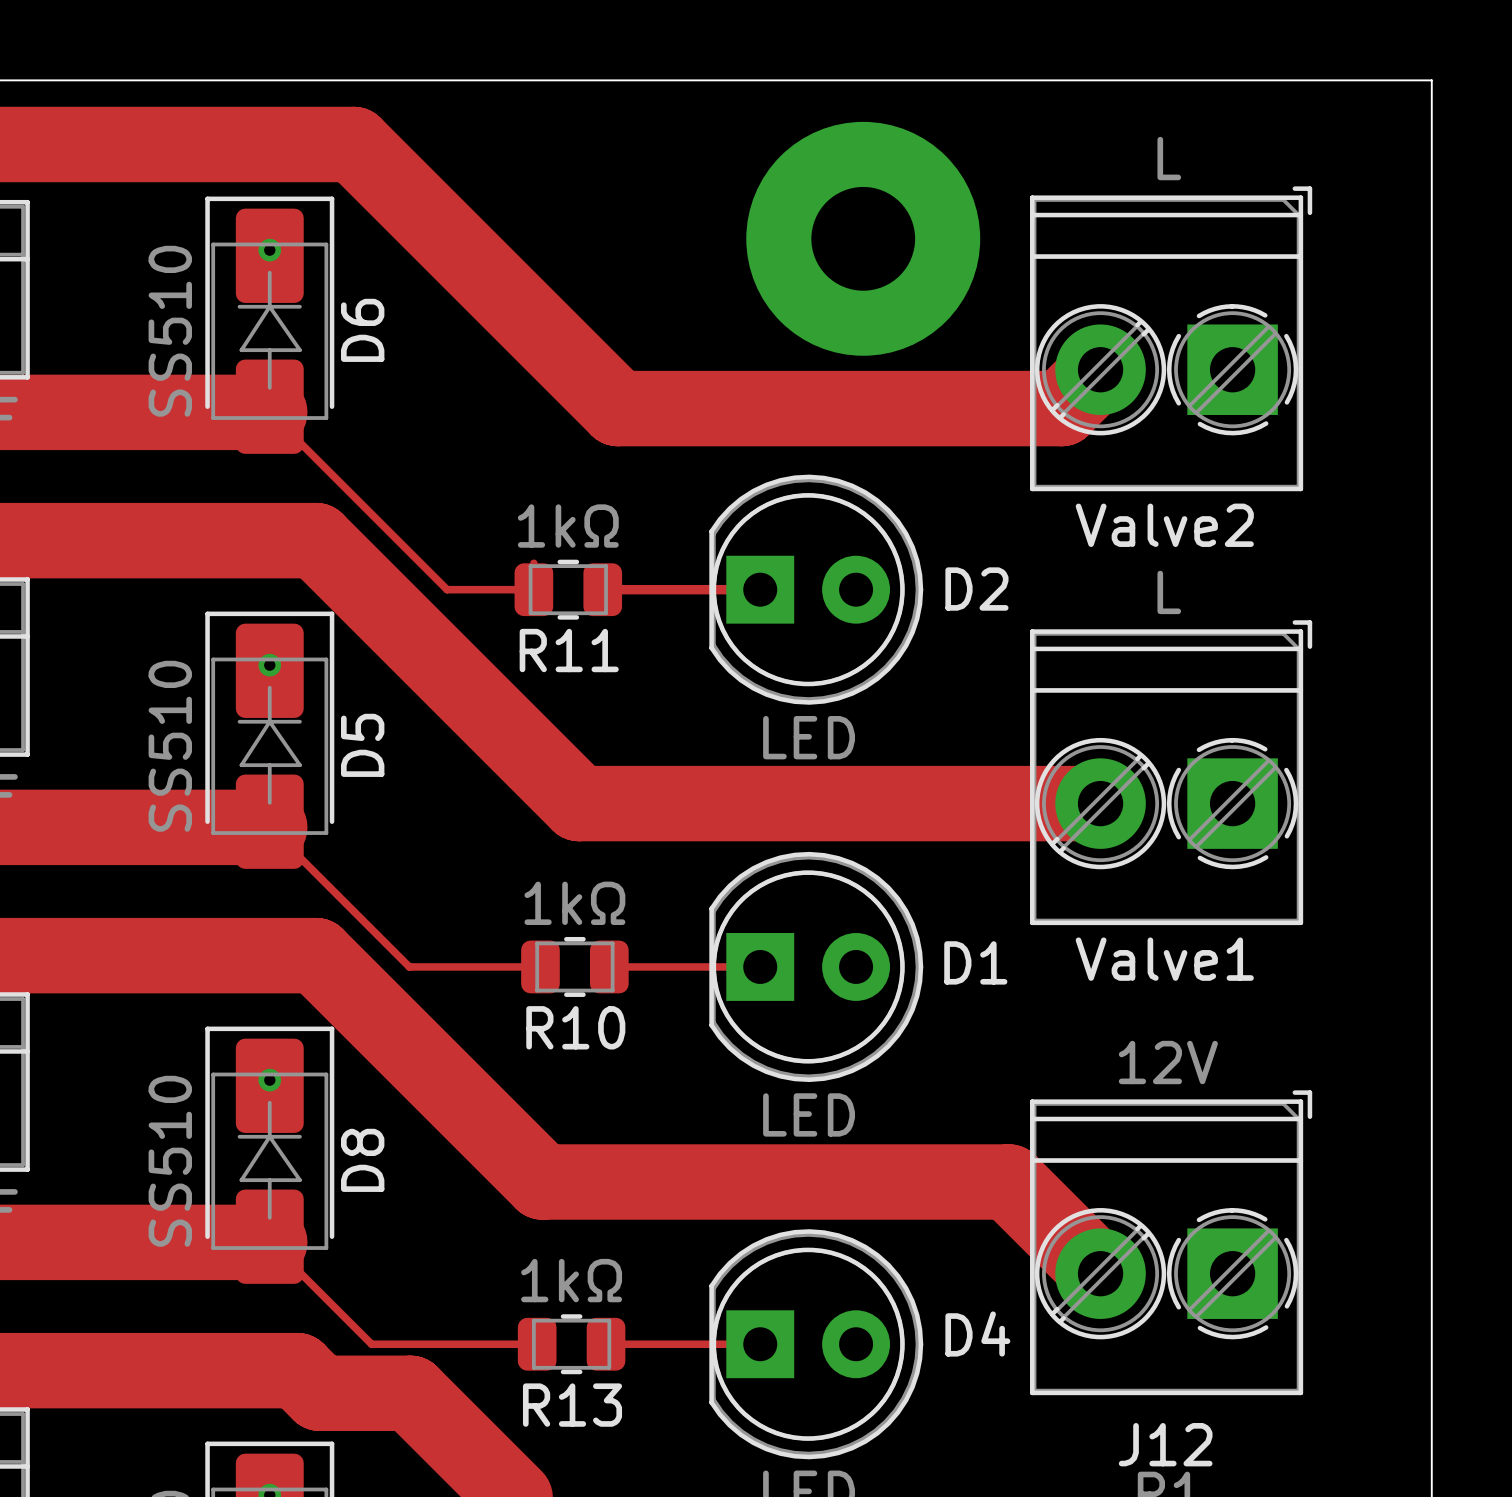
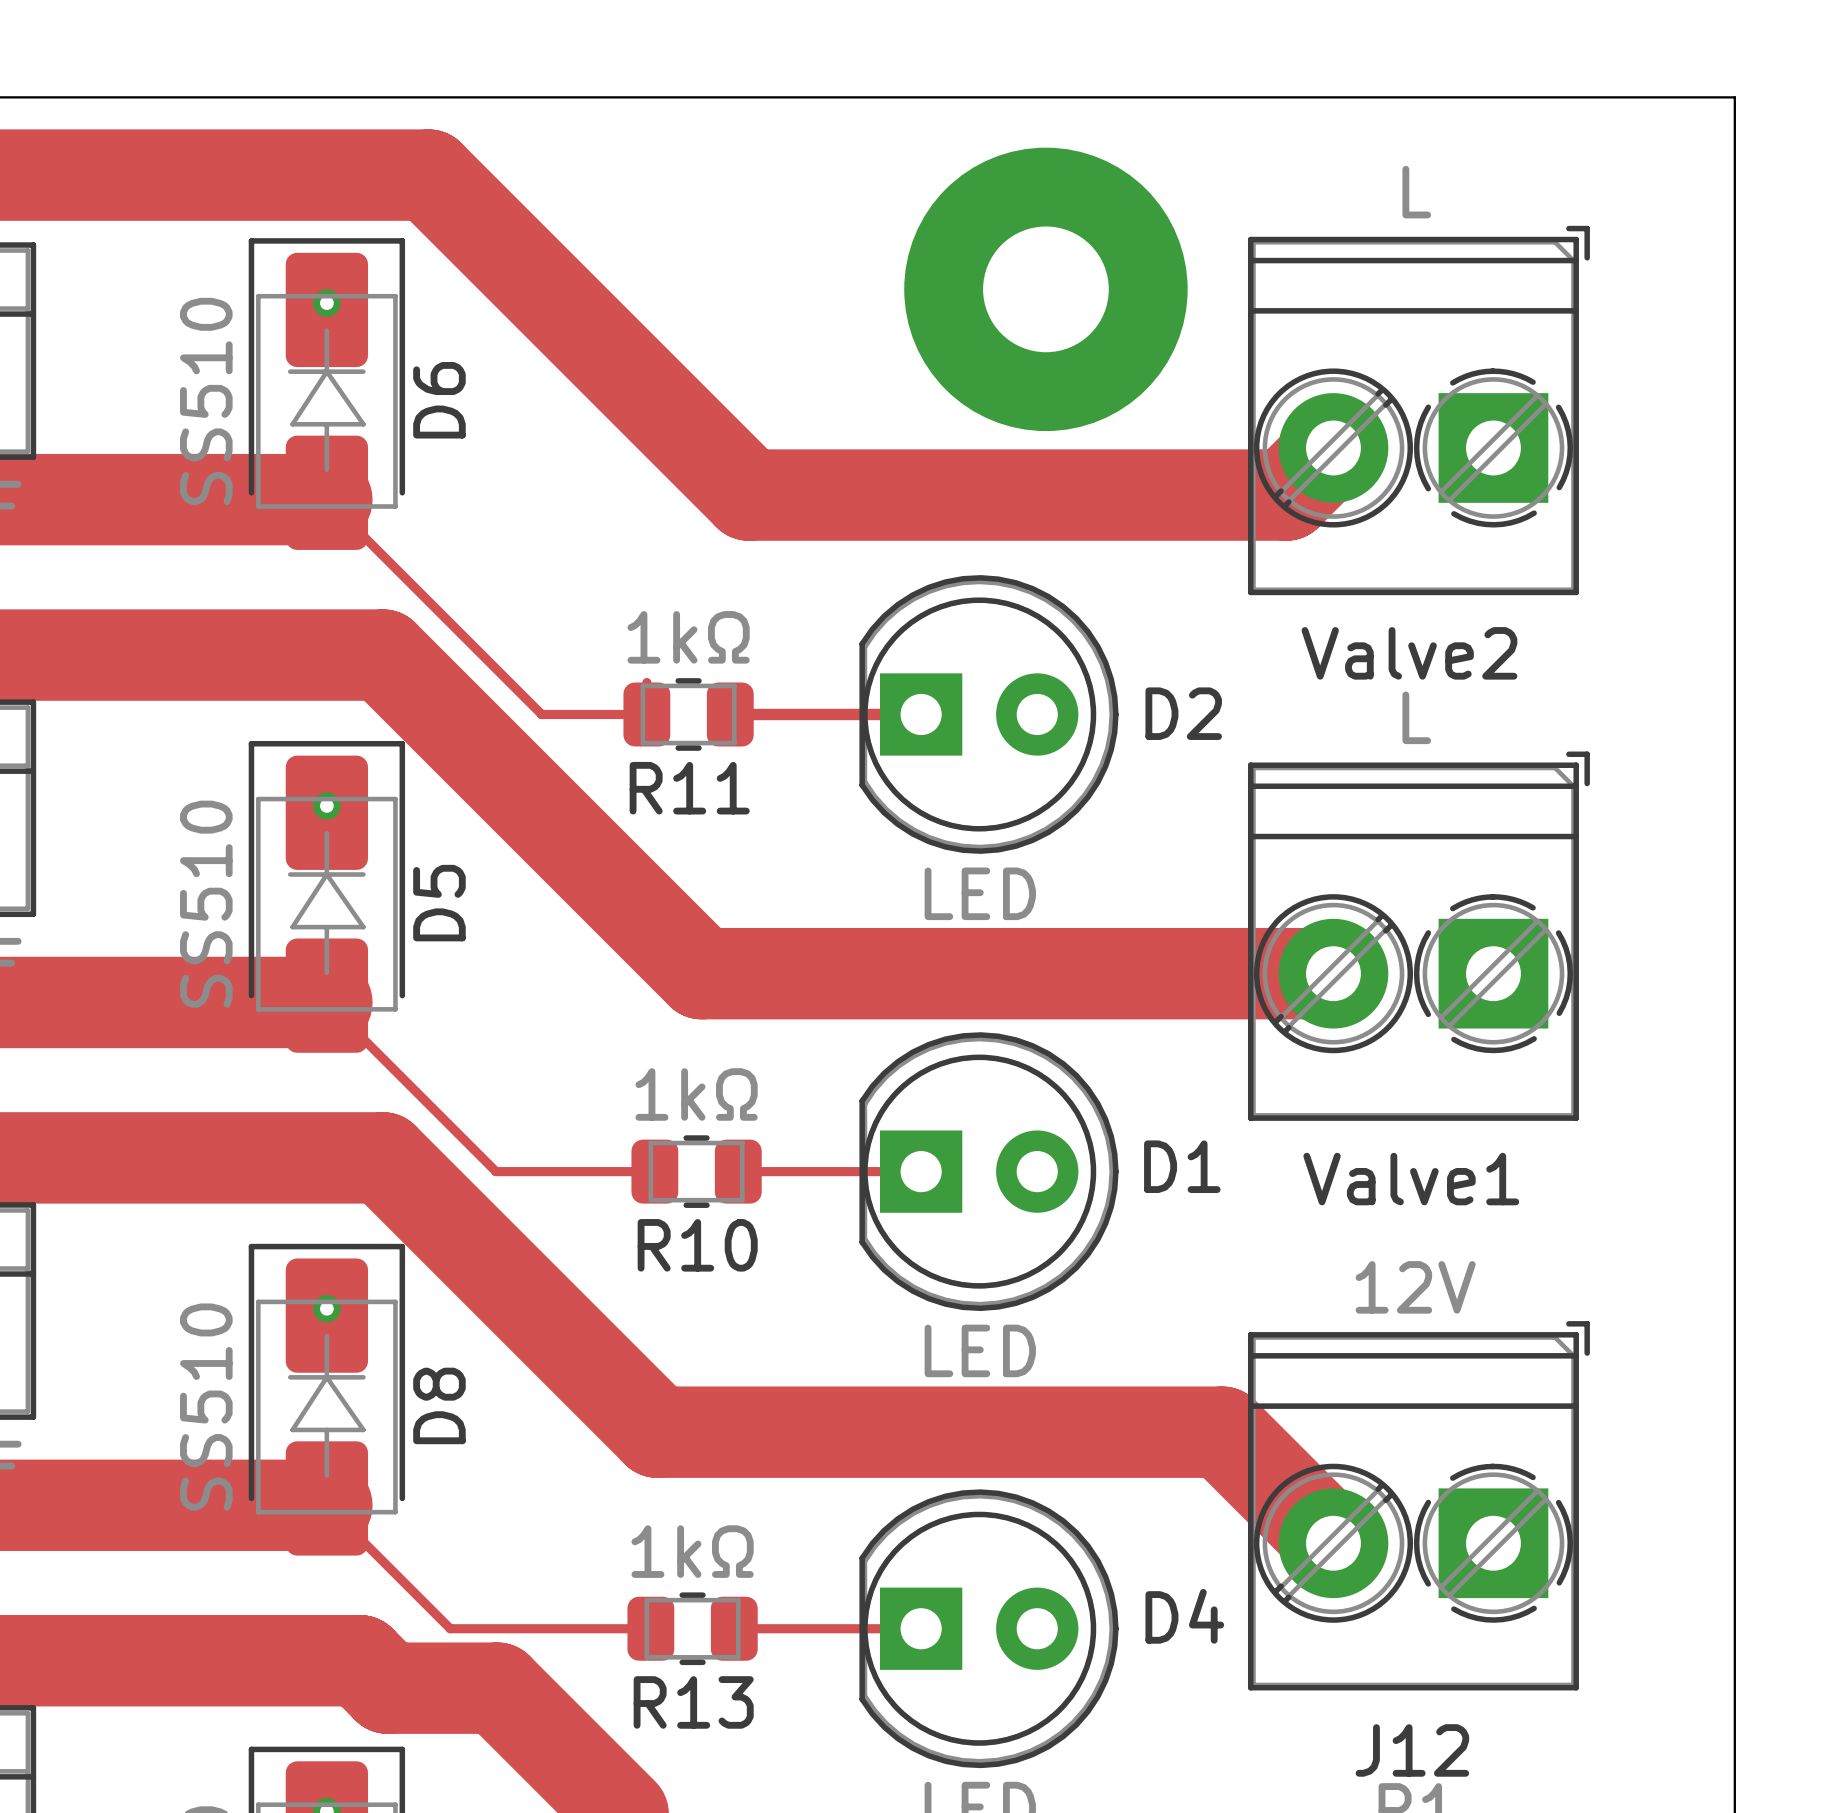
Valve2 name position: Valve2 (1164, 525) -> Valve2 (1409, 653)
Valve1 name position: Valve1 (1164, 959) -> Valve1 (1411, 1179)

